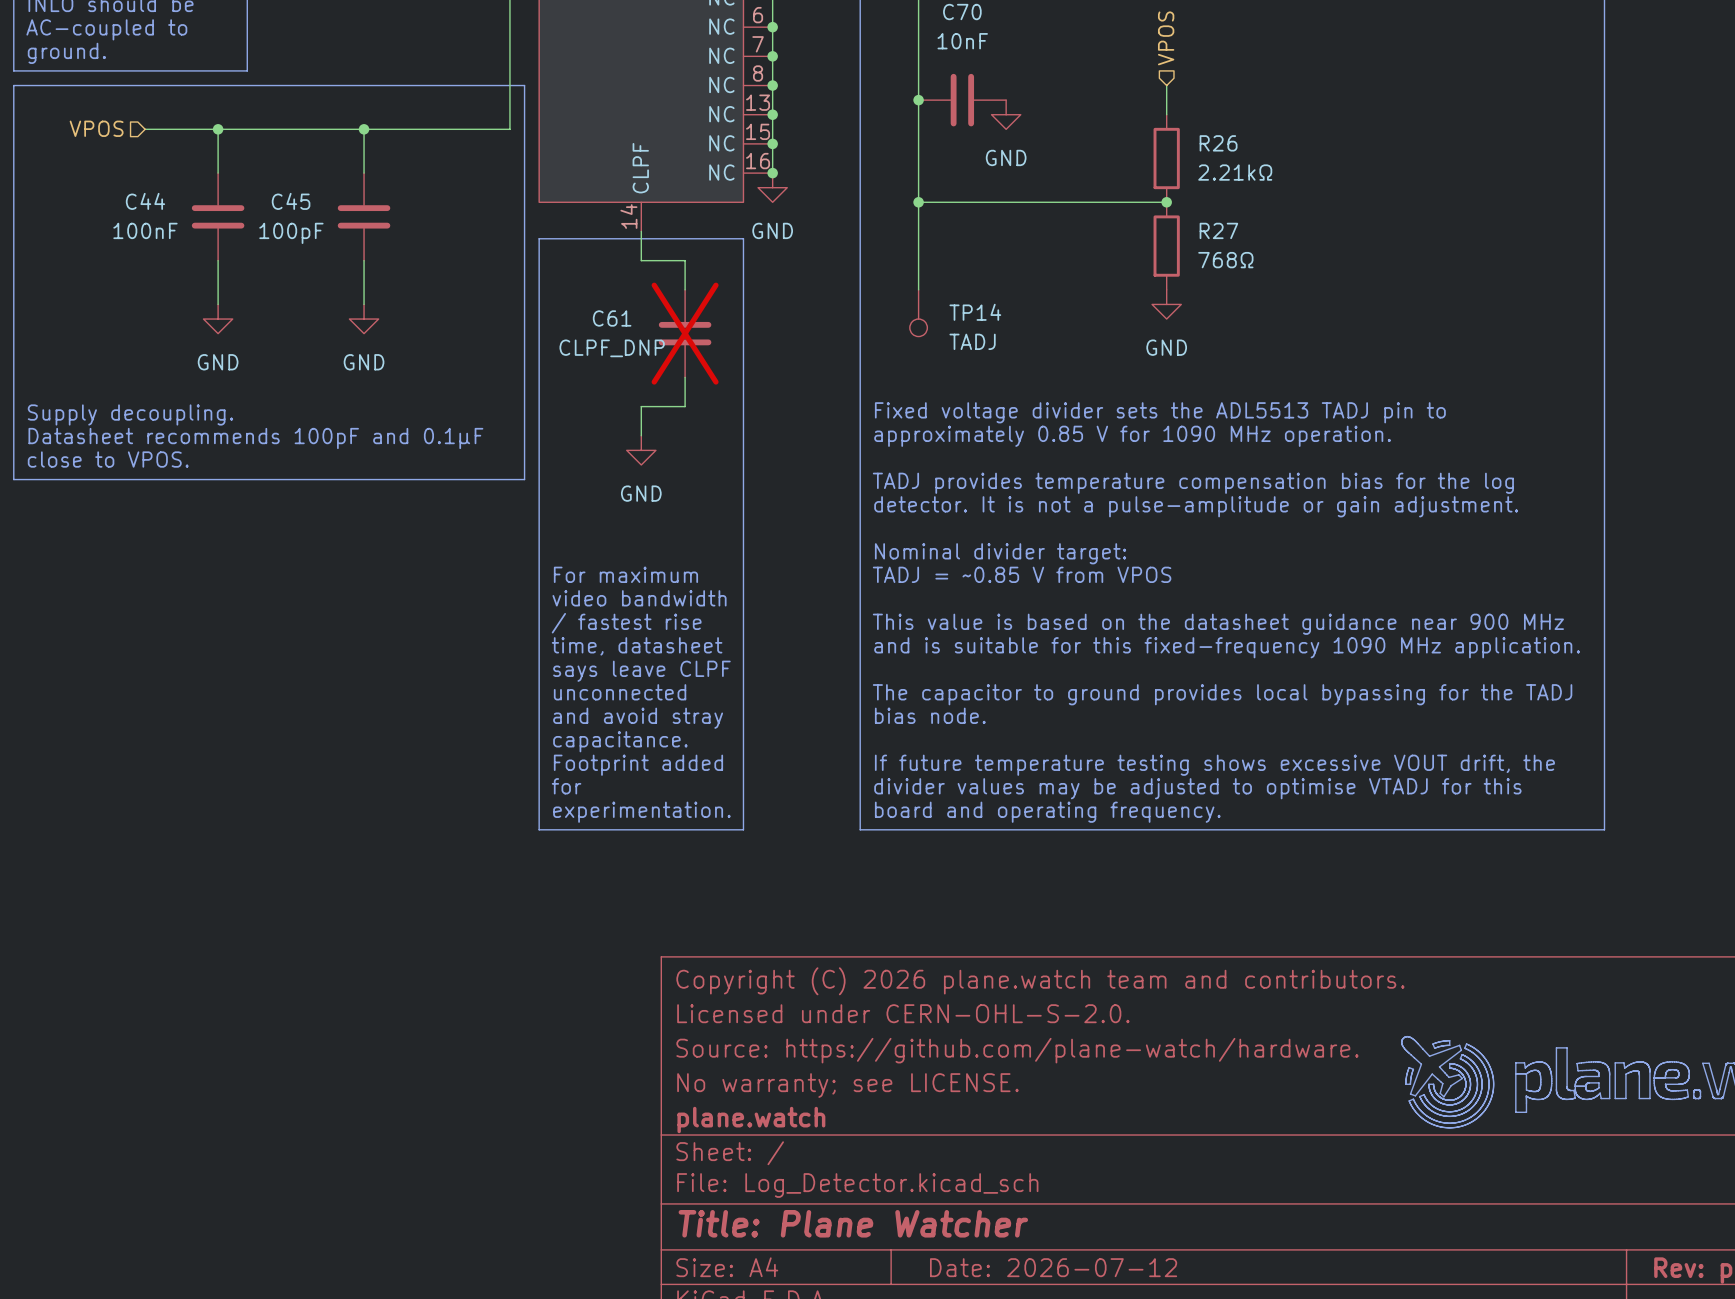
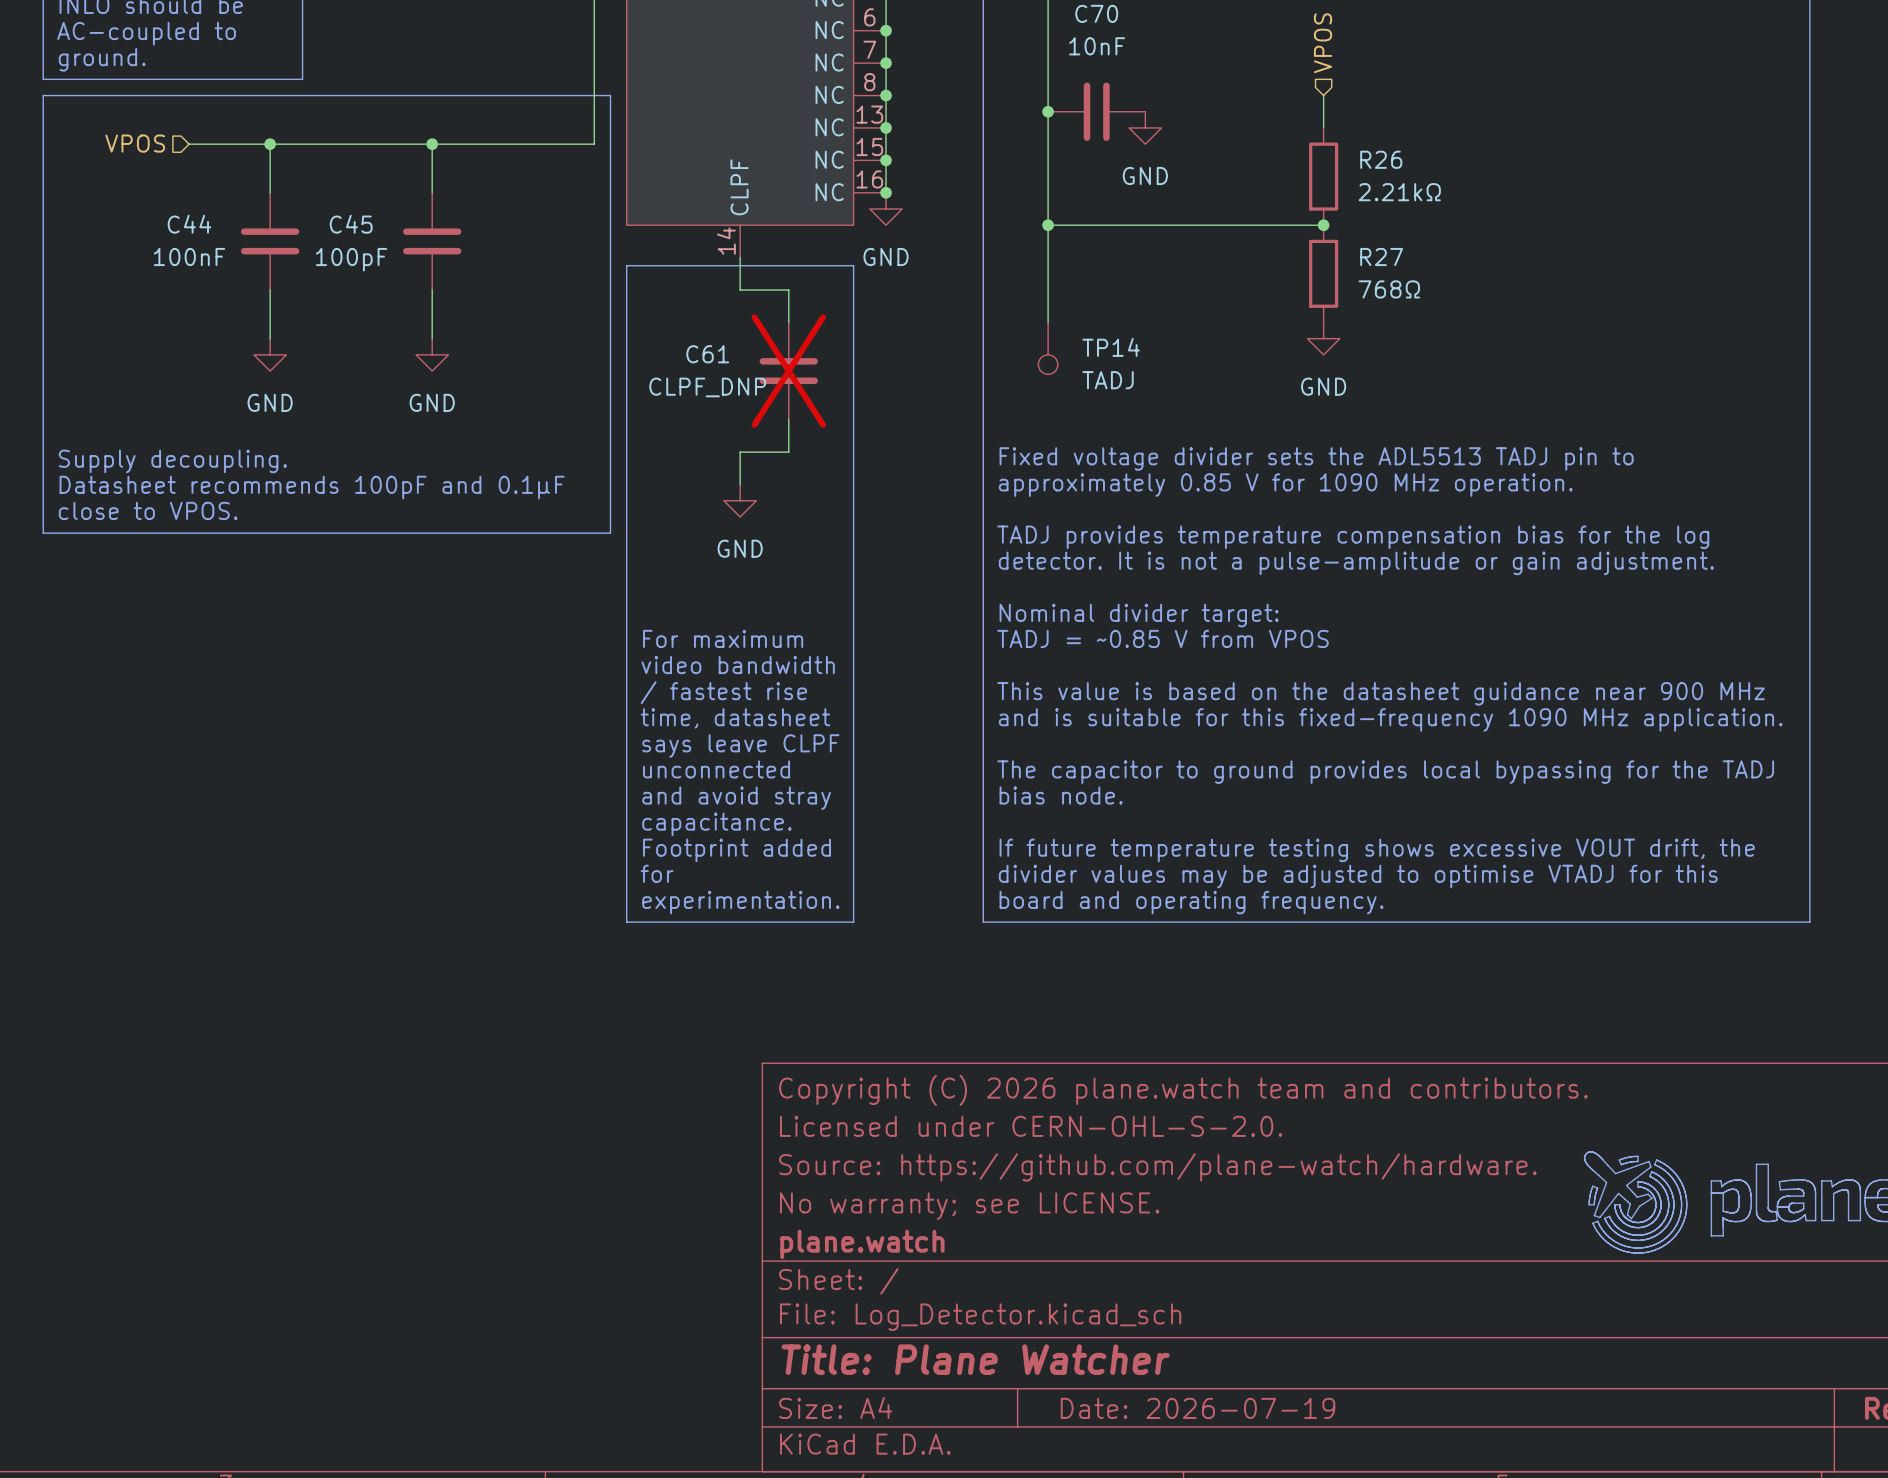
title block: Date: 2026-07-12 (1053, 1267) -> Date: 2026-07-19 (1197, 1408)

